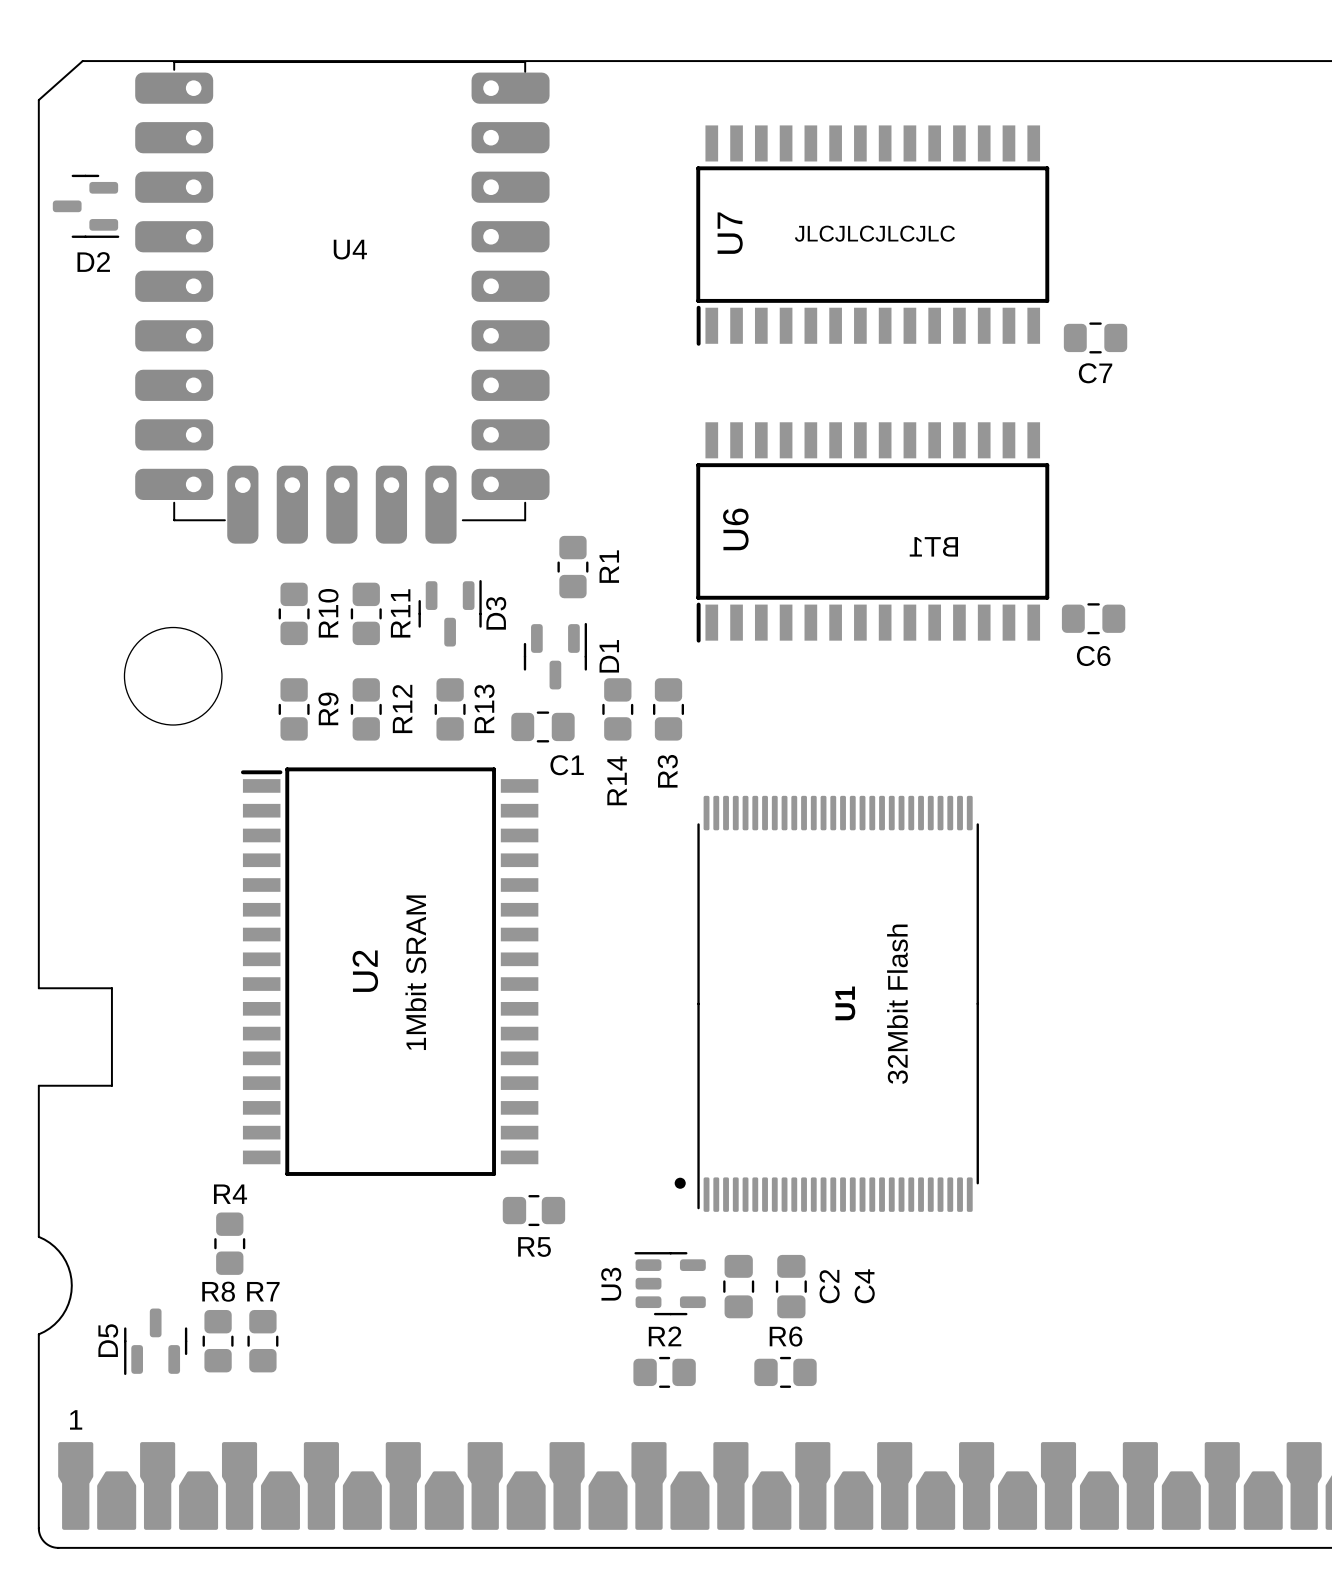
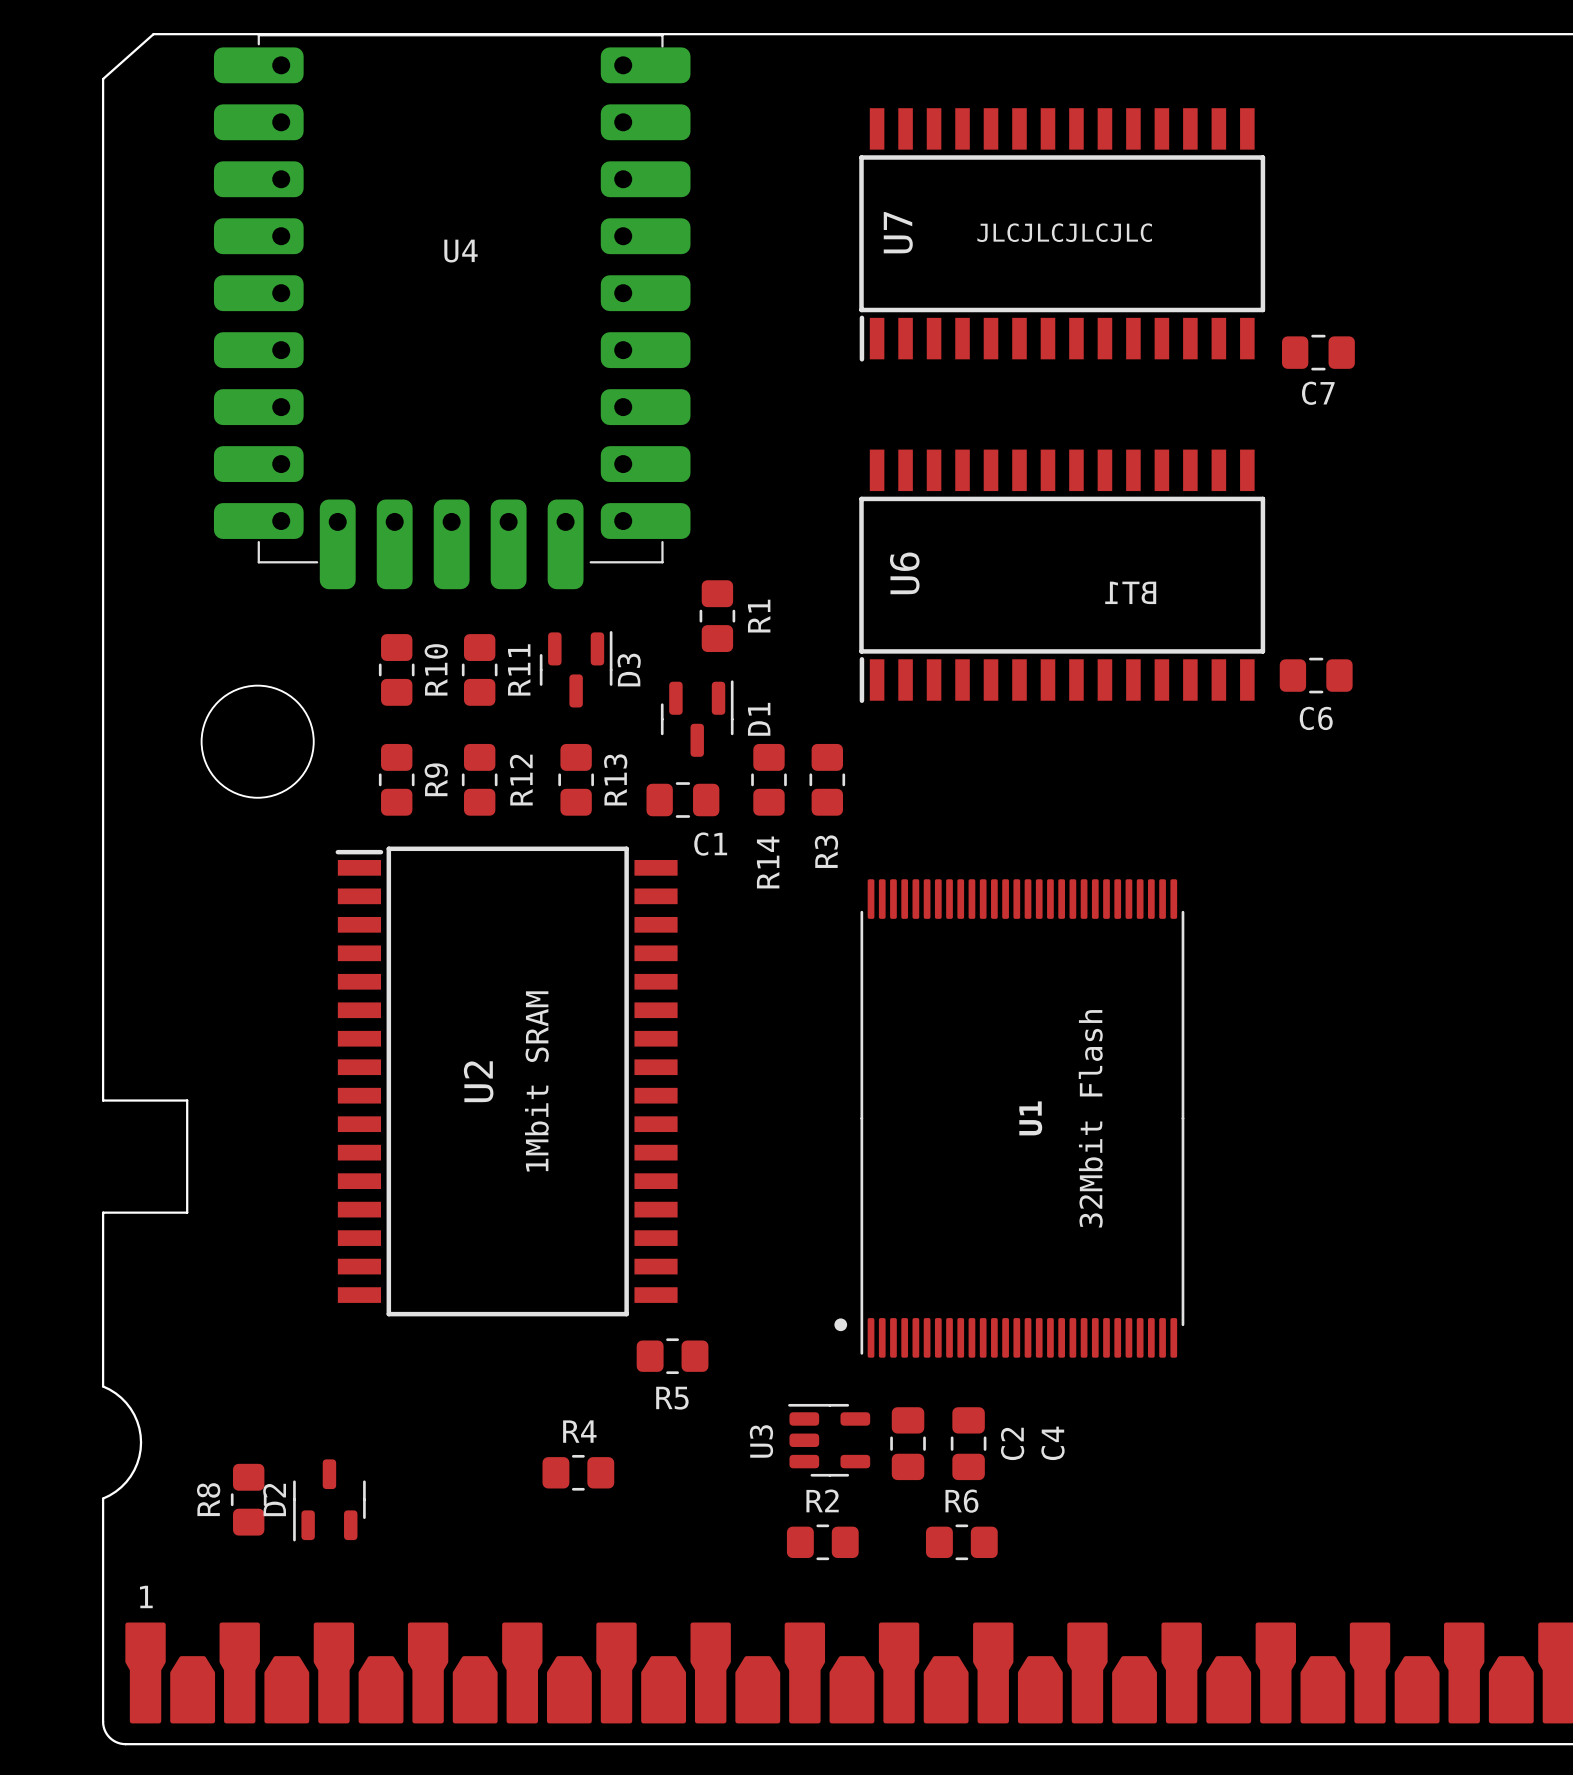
D2 footprint: [52, 174, 120, 238] -> [293, 1459, 366, 1542]
D2 name position: D2 (93, 262) -> D2 (274, 1499)
R4 rotation: 0° (229, 1243) -> 90° clockwise (578, 1472)
R4 position: (229, 1243) -> (578, 1472)
R8 name rotation: 0° (218, 1291) -> 90° counterclockwise (208, 1499)
R8 name position: R8 (218, 1291) -> R8 (208, 1499)
D5: (155, 1341) -> none
R8 position: (218, 1341) -> (248, 1499)
R7: (262, 1341) -> none

